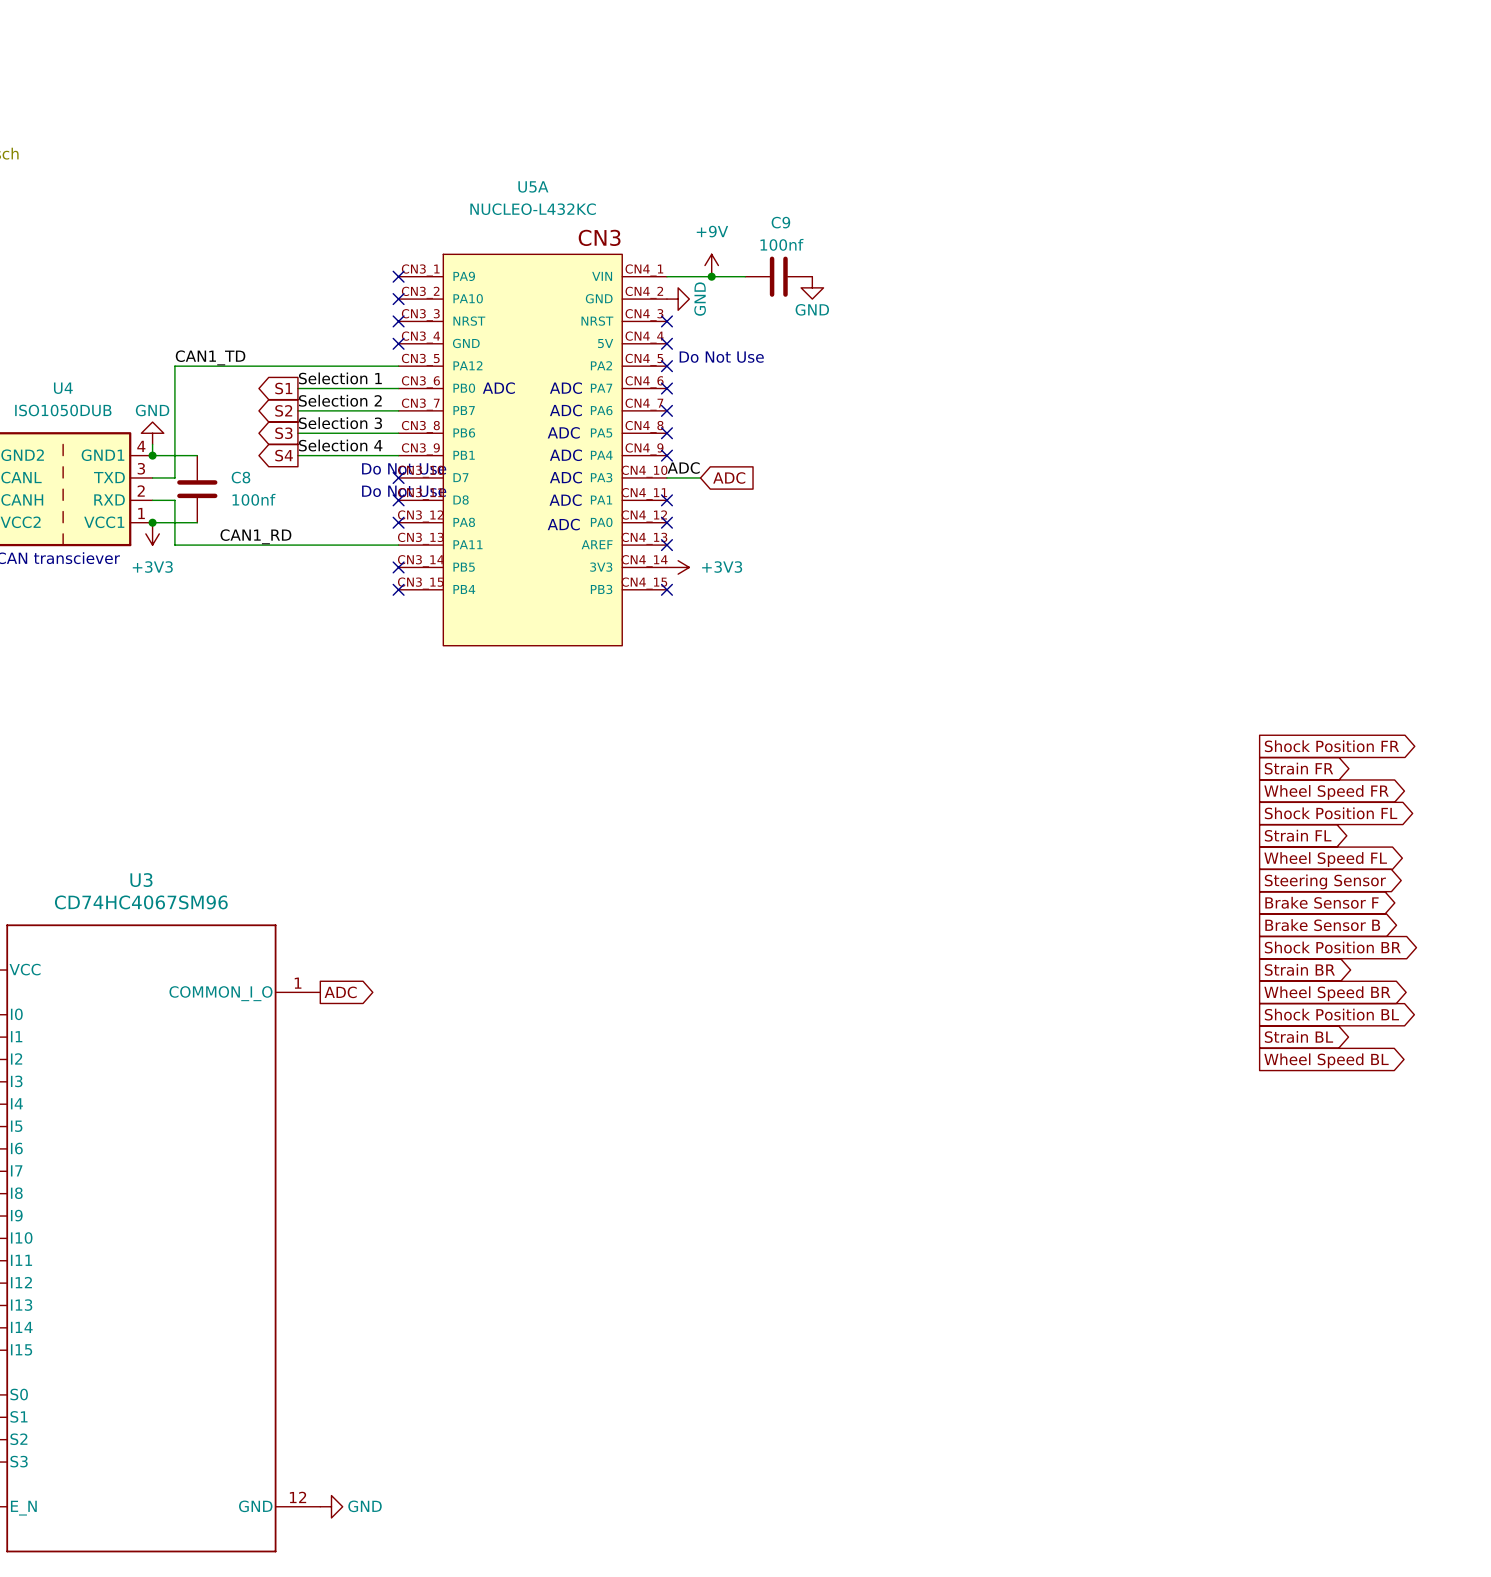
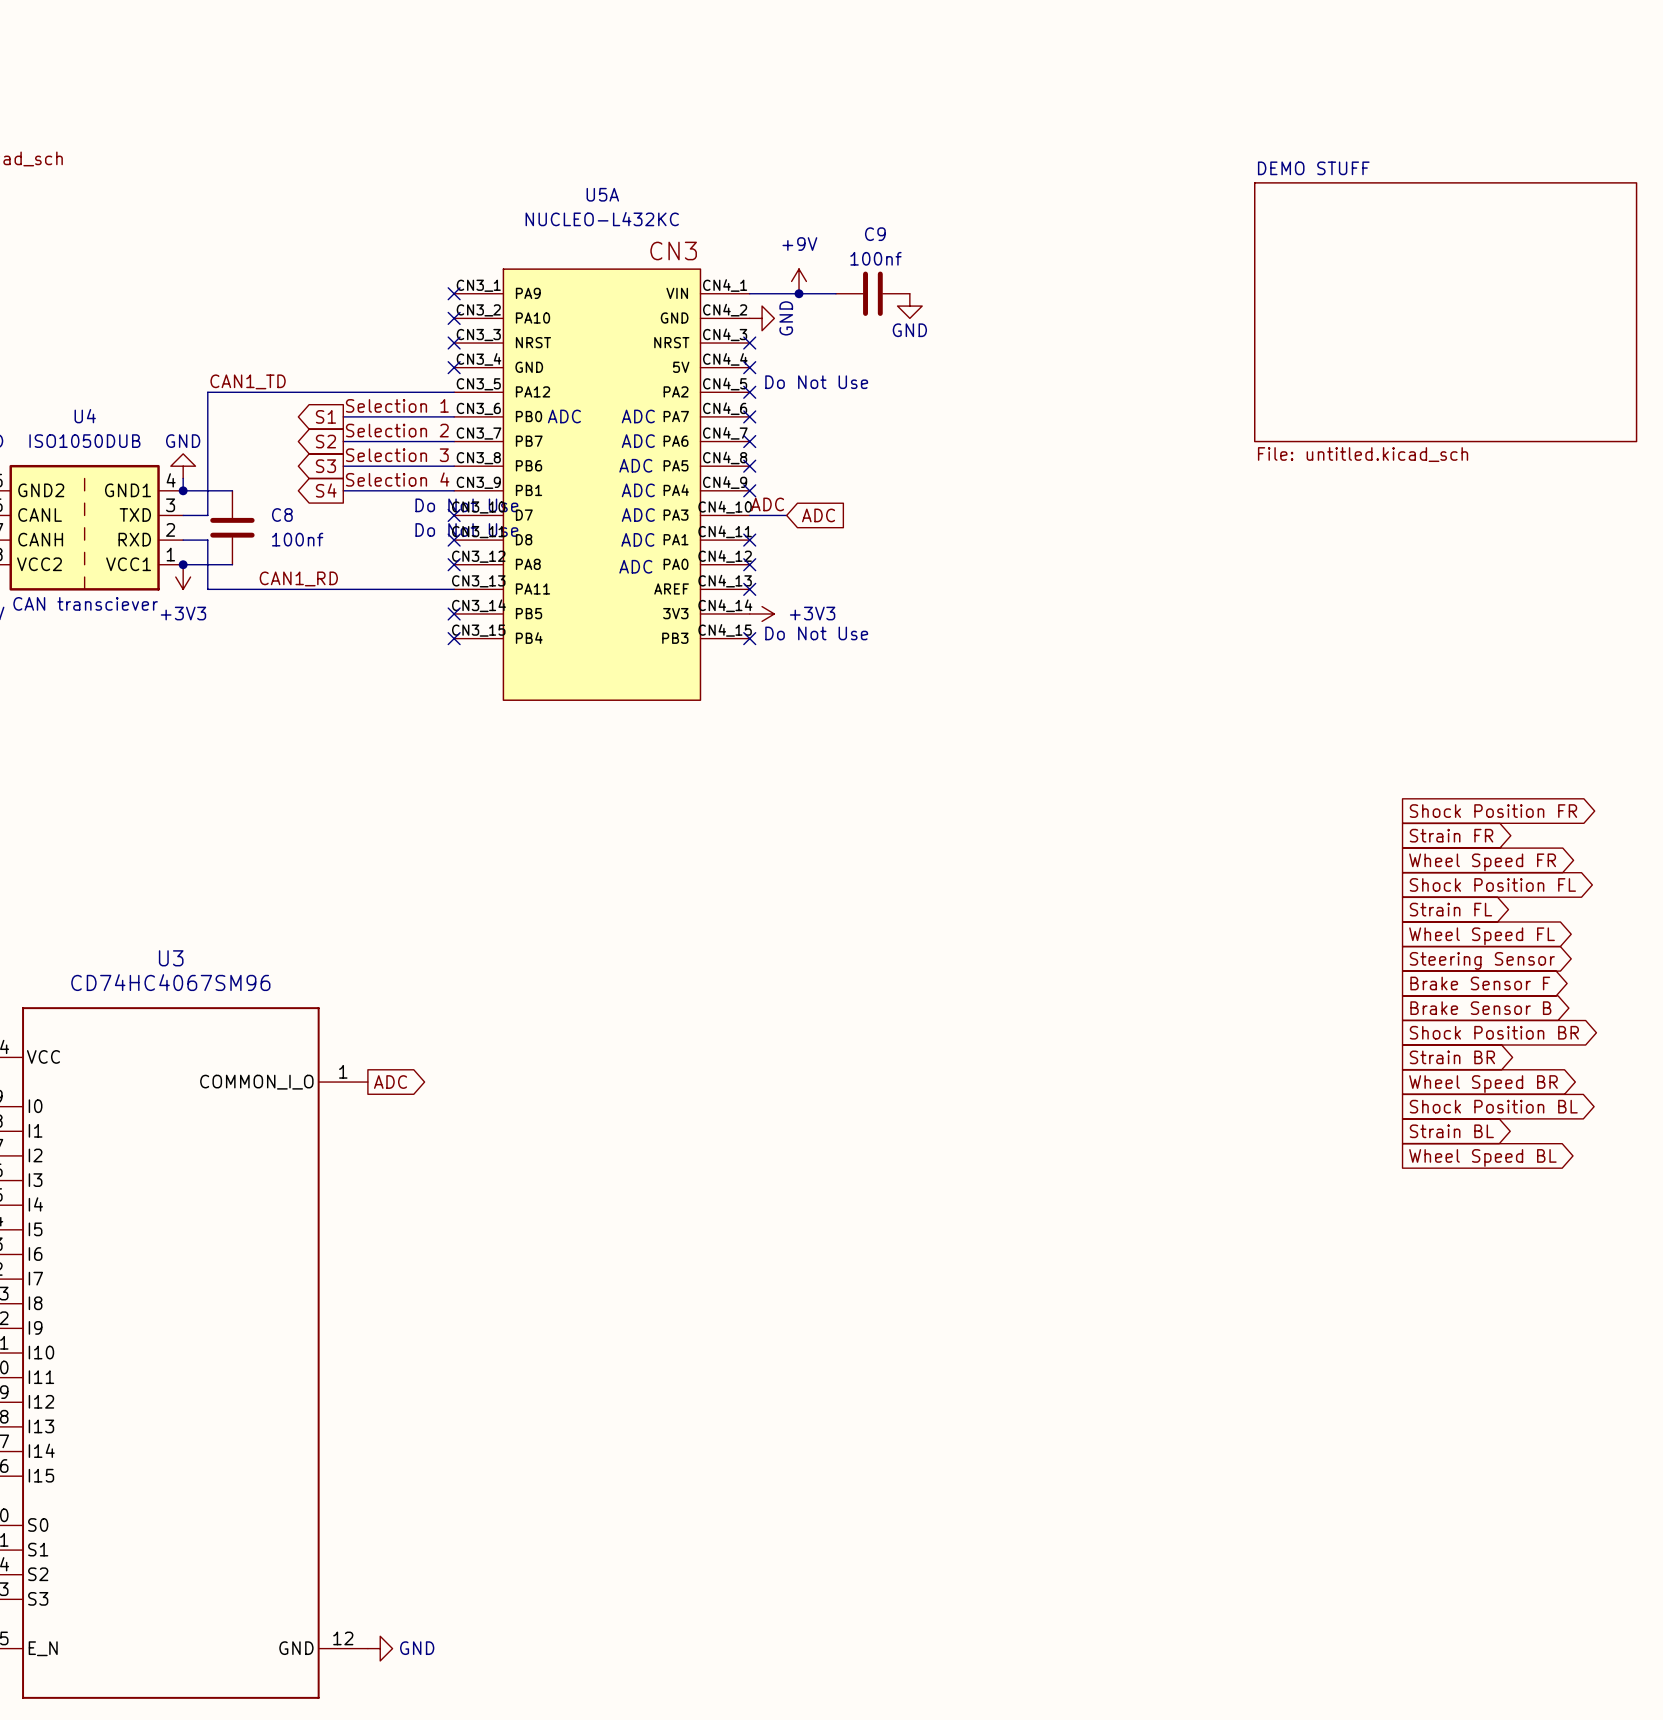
sheet DEMO STUFF: none -> File: untitled.kicad_sch (1445, 312)
text: none -> Do Not Use (816, 633)

